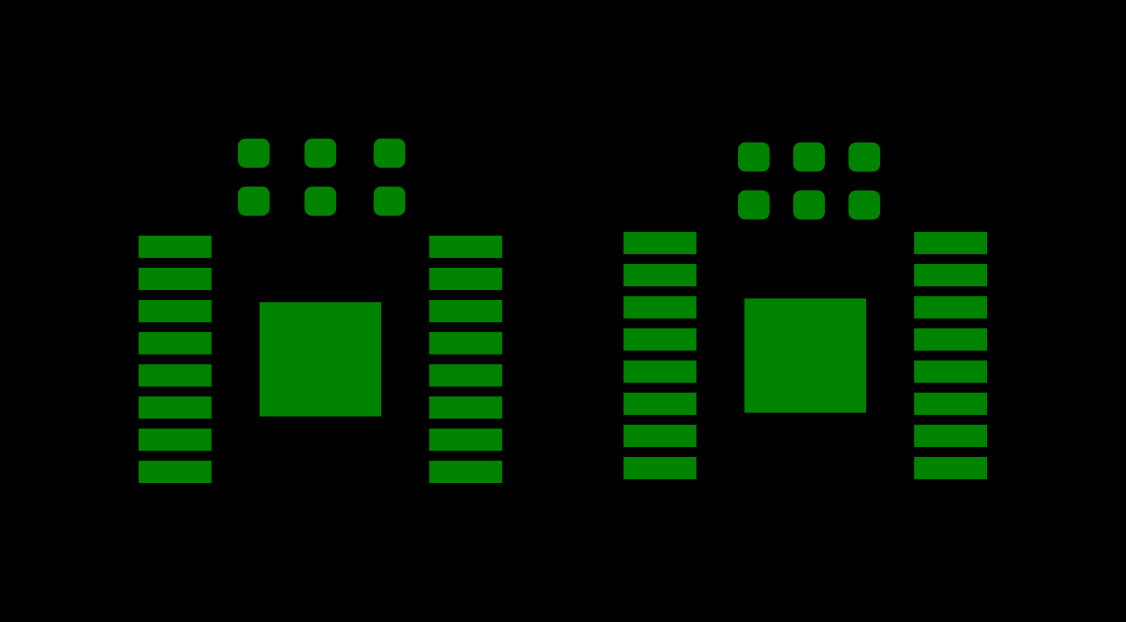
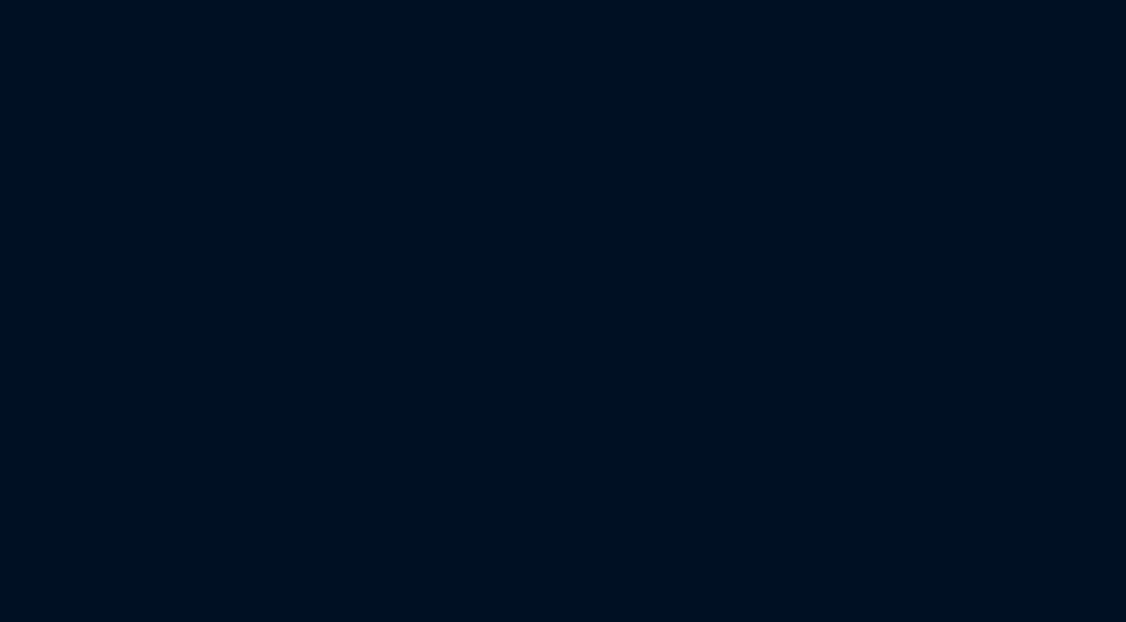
part: (253, 177) -> none
part: (320, 177) -> none
part: (389, 177) -> none
part: (753, 180) -> none
part: (809, 180) -> none
part: (864, 181) -> none
part: (805, 355) -> none
part: (320, 359) -> none

